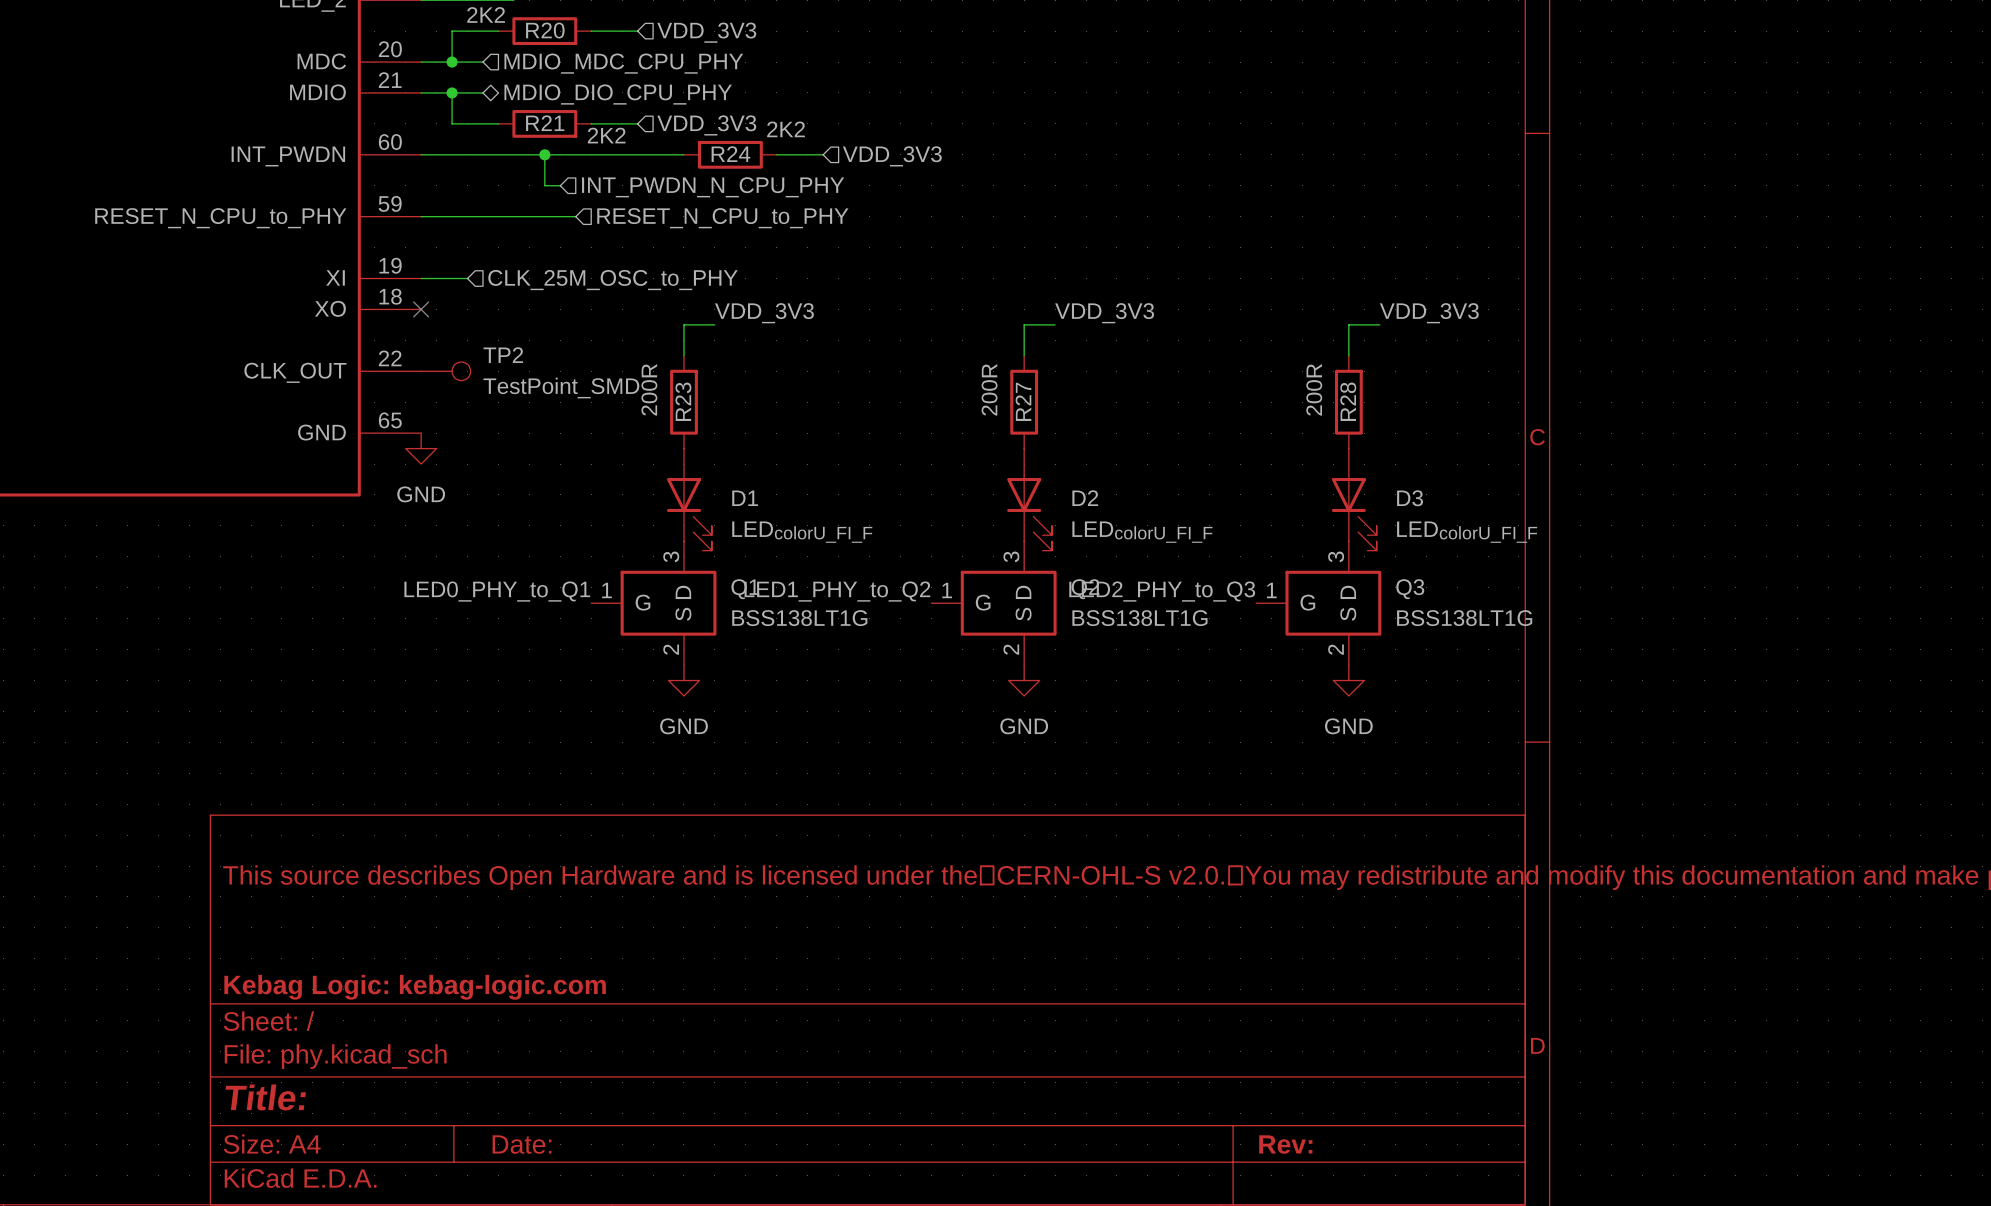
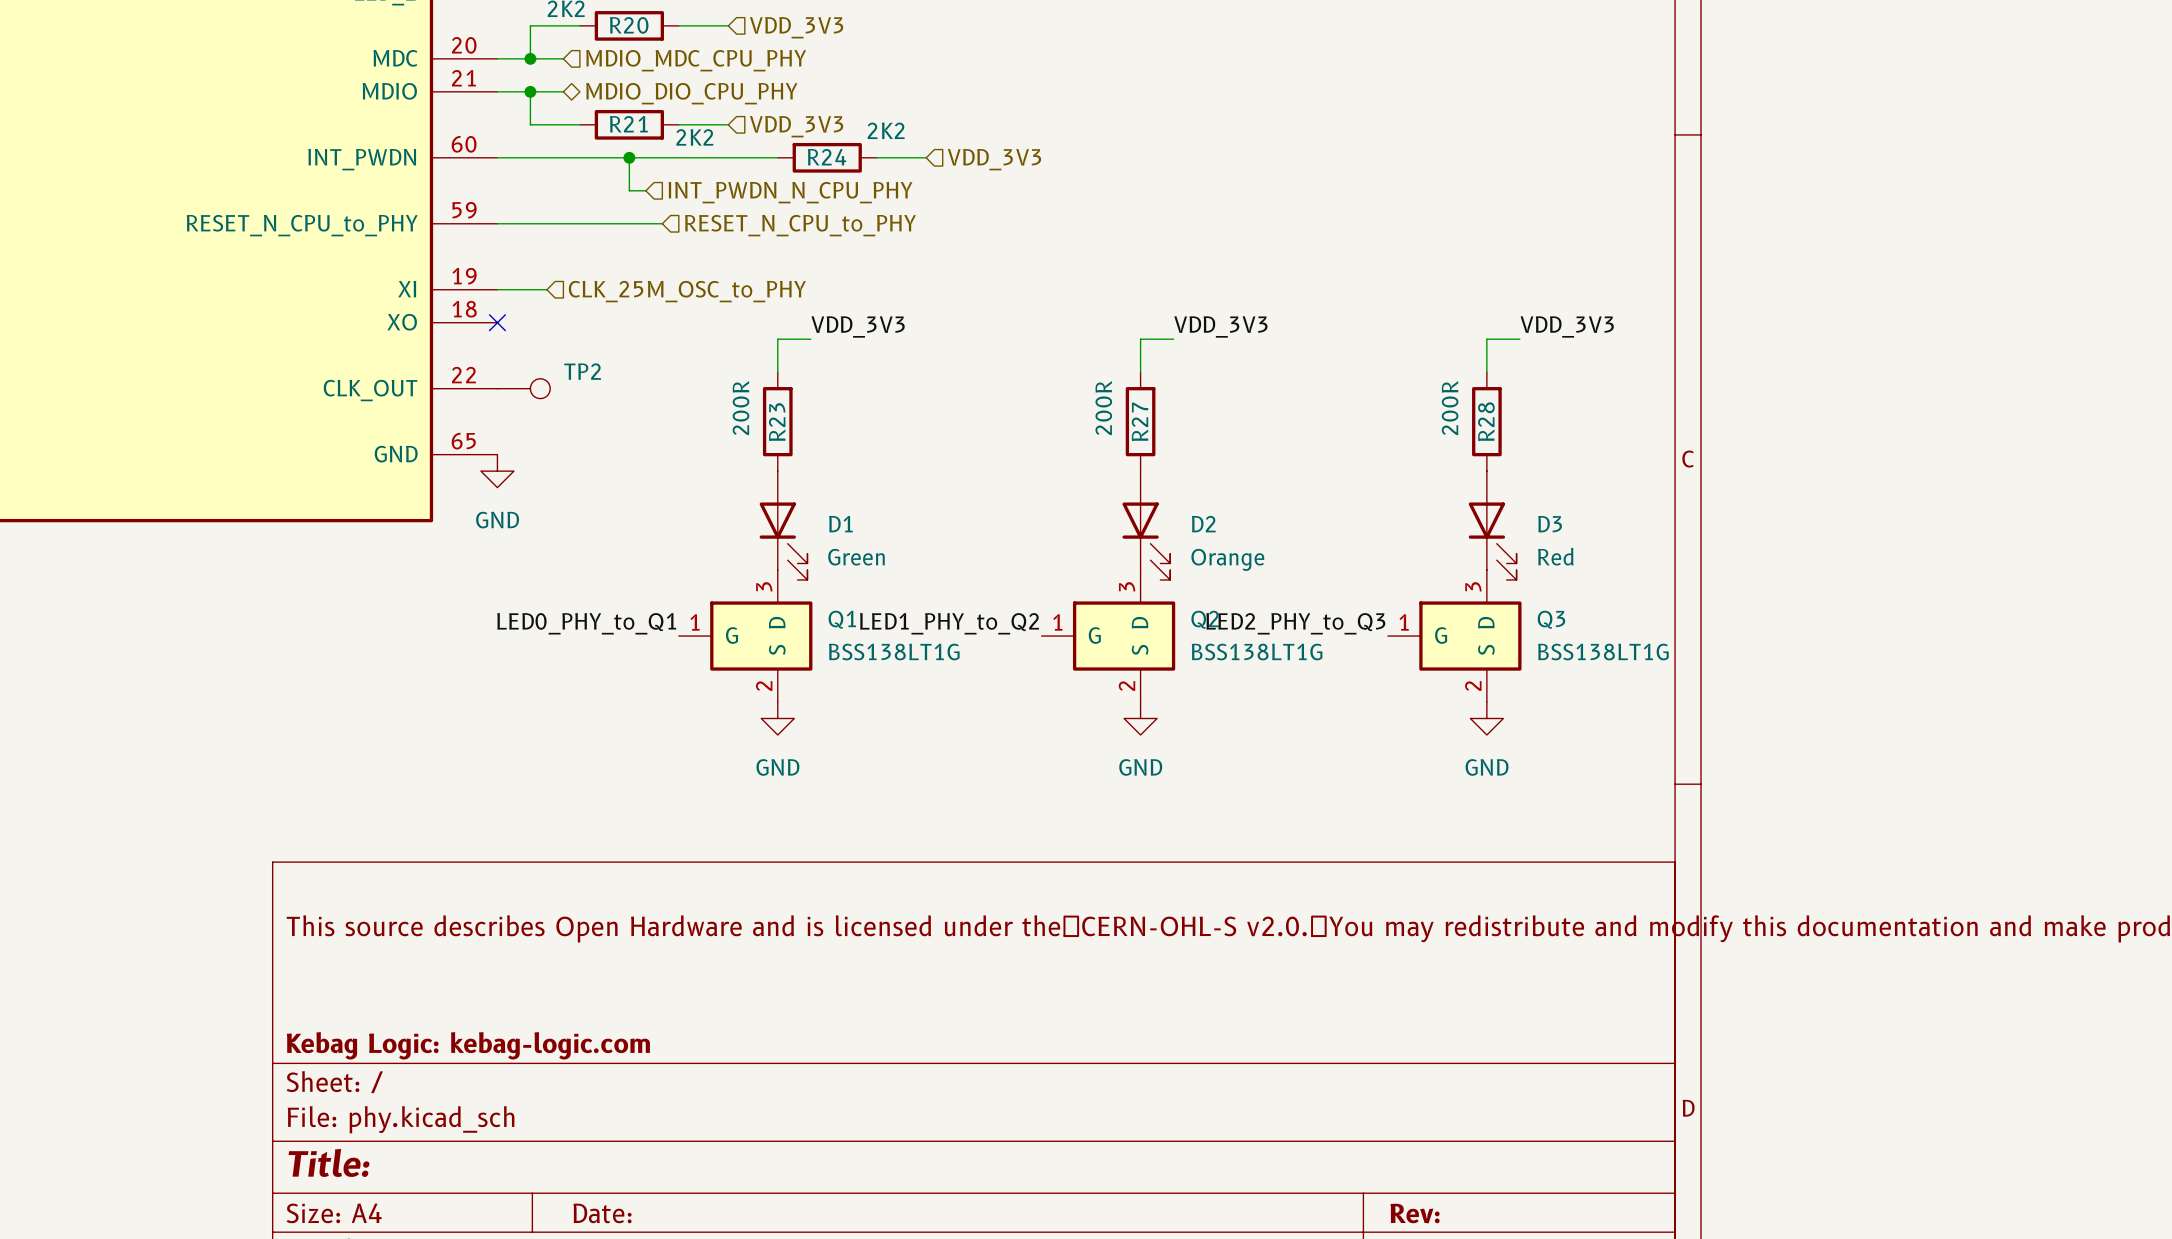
TP2 value: TestPoint_SMD (561, 387) -> none
D1 value: LEDcolorU_FI_F (802, 532) -> Green (856, 557)
D2 value: LEDcolorU_FI_F (1142, 532) -> Orange (1227, 559)
D3 value: LEDcolorU_FI_F (1467, 532) -> Red (1555, 556)

